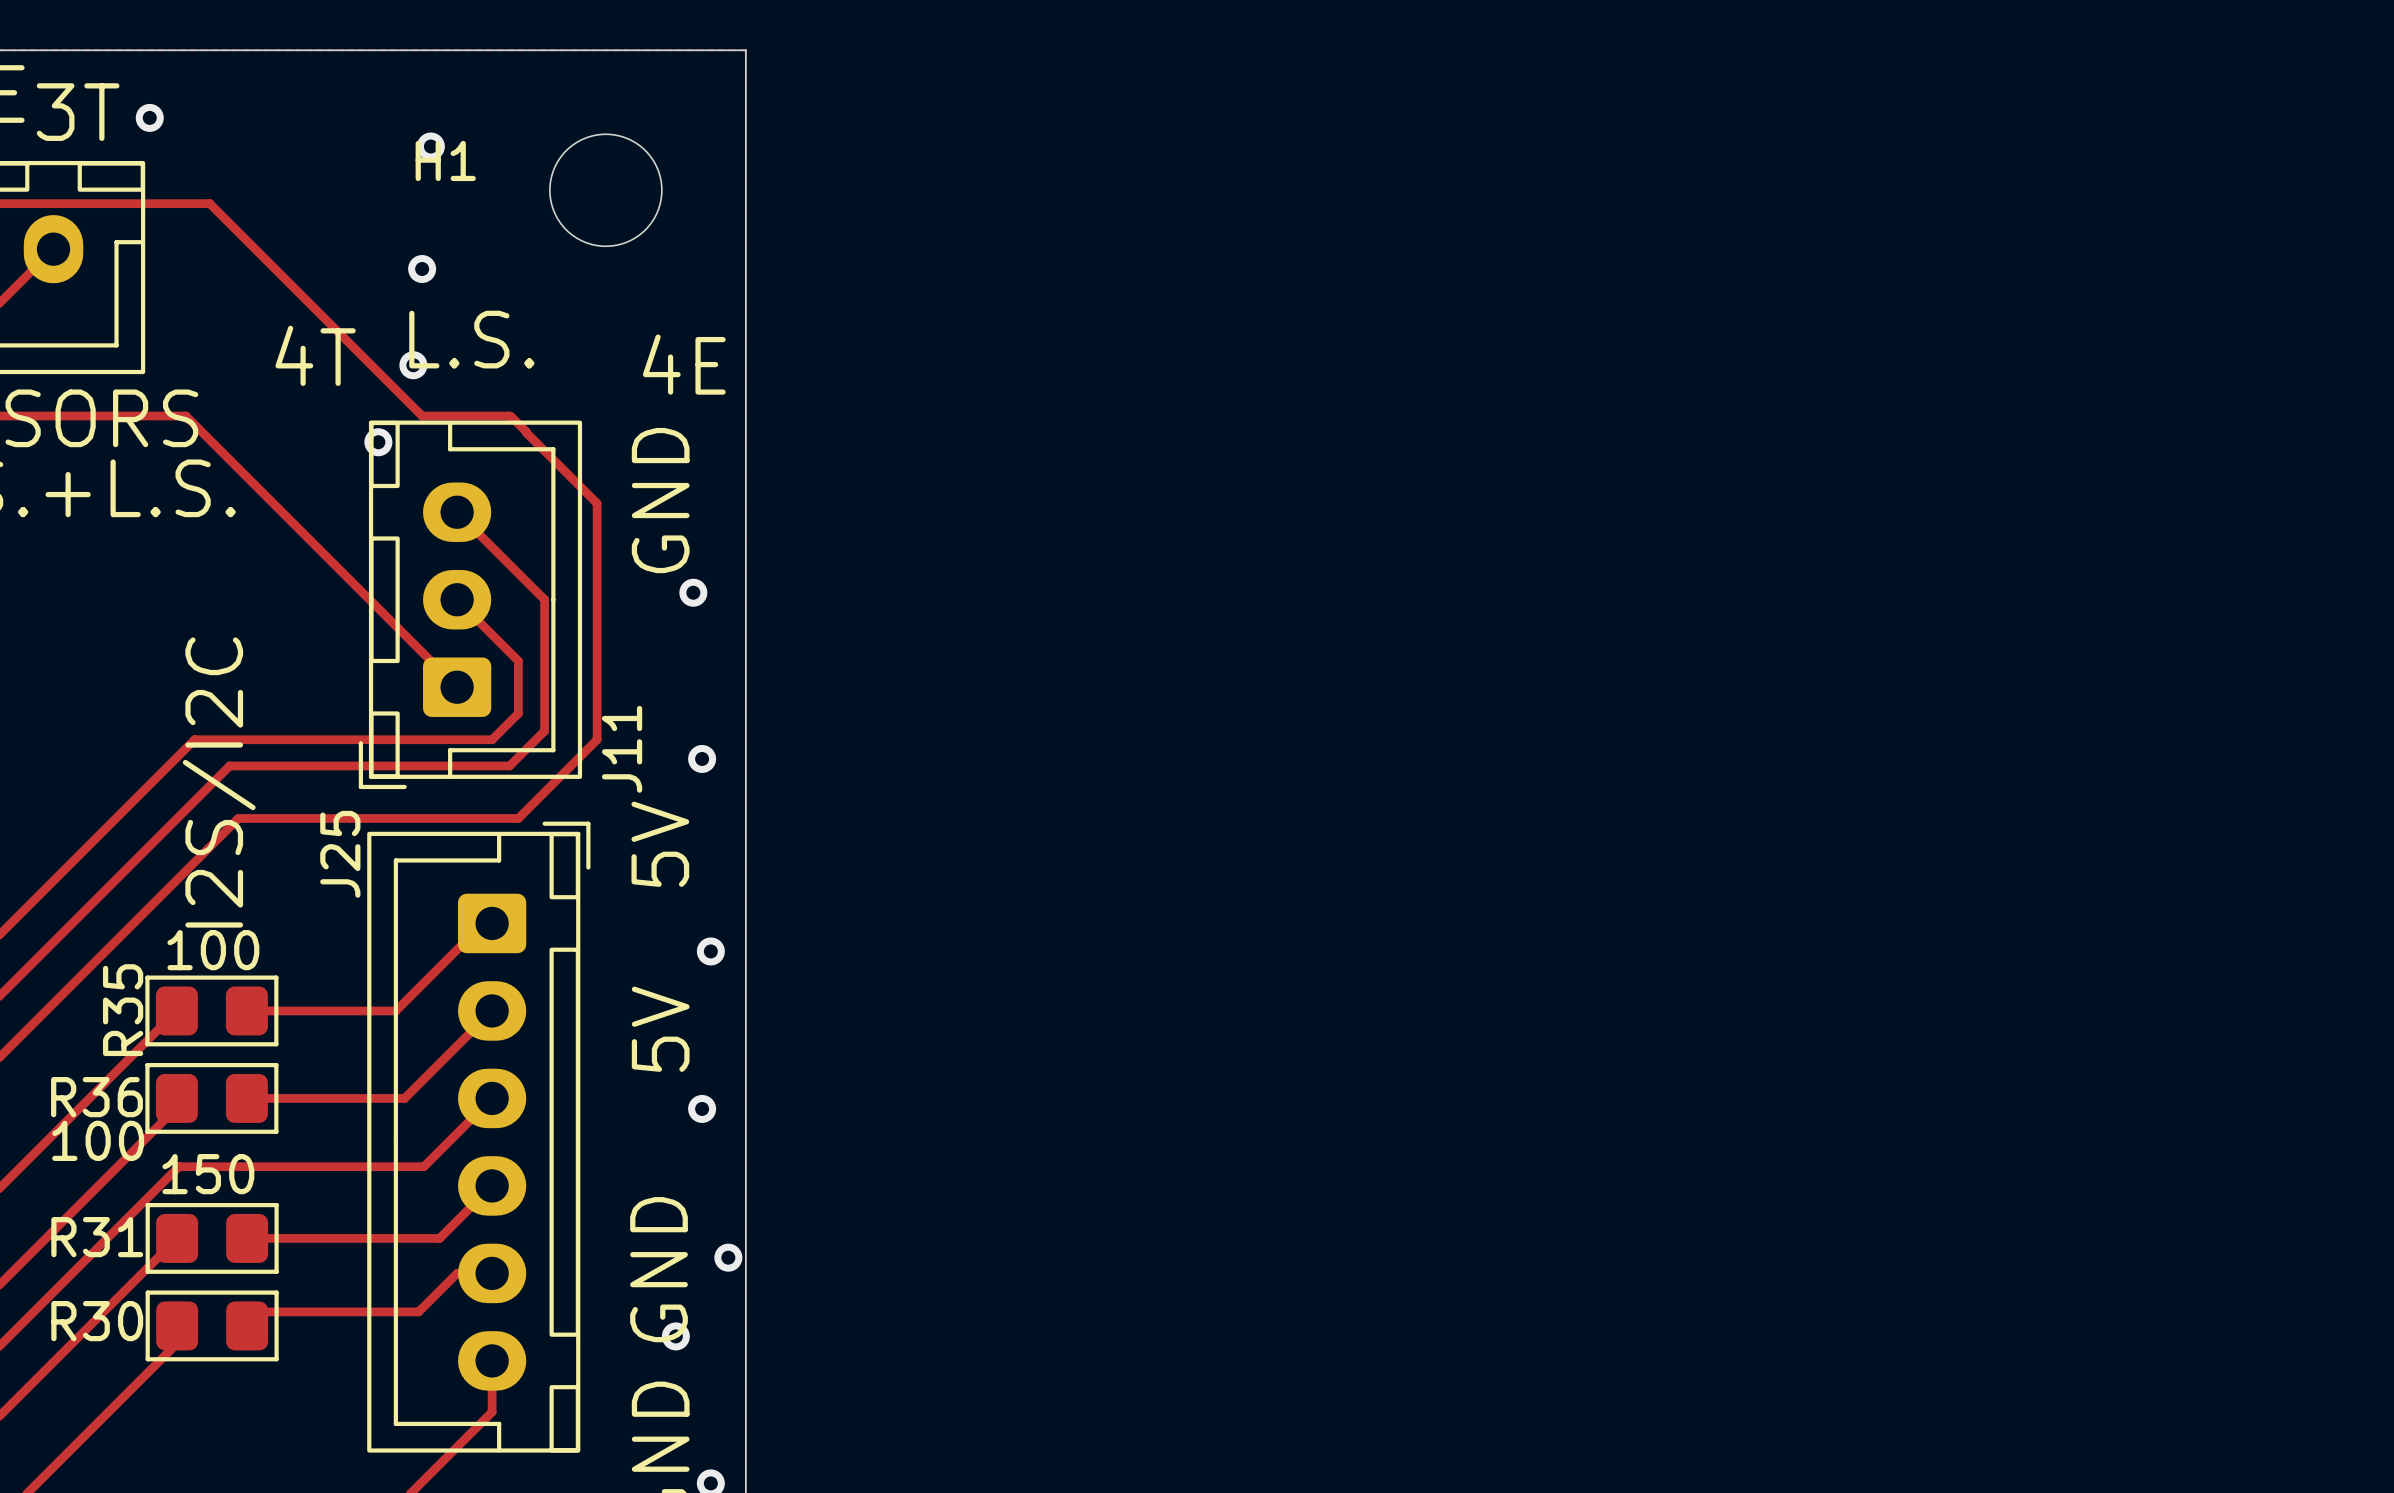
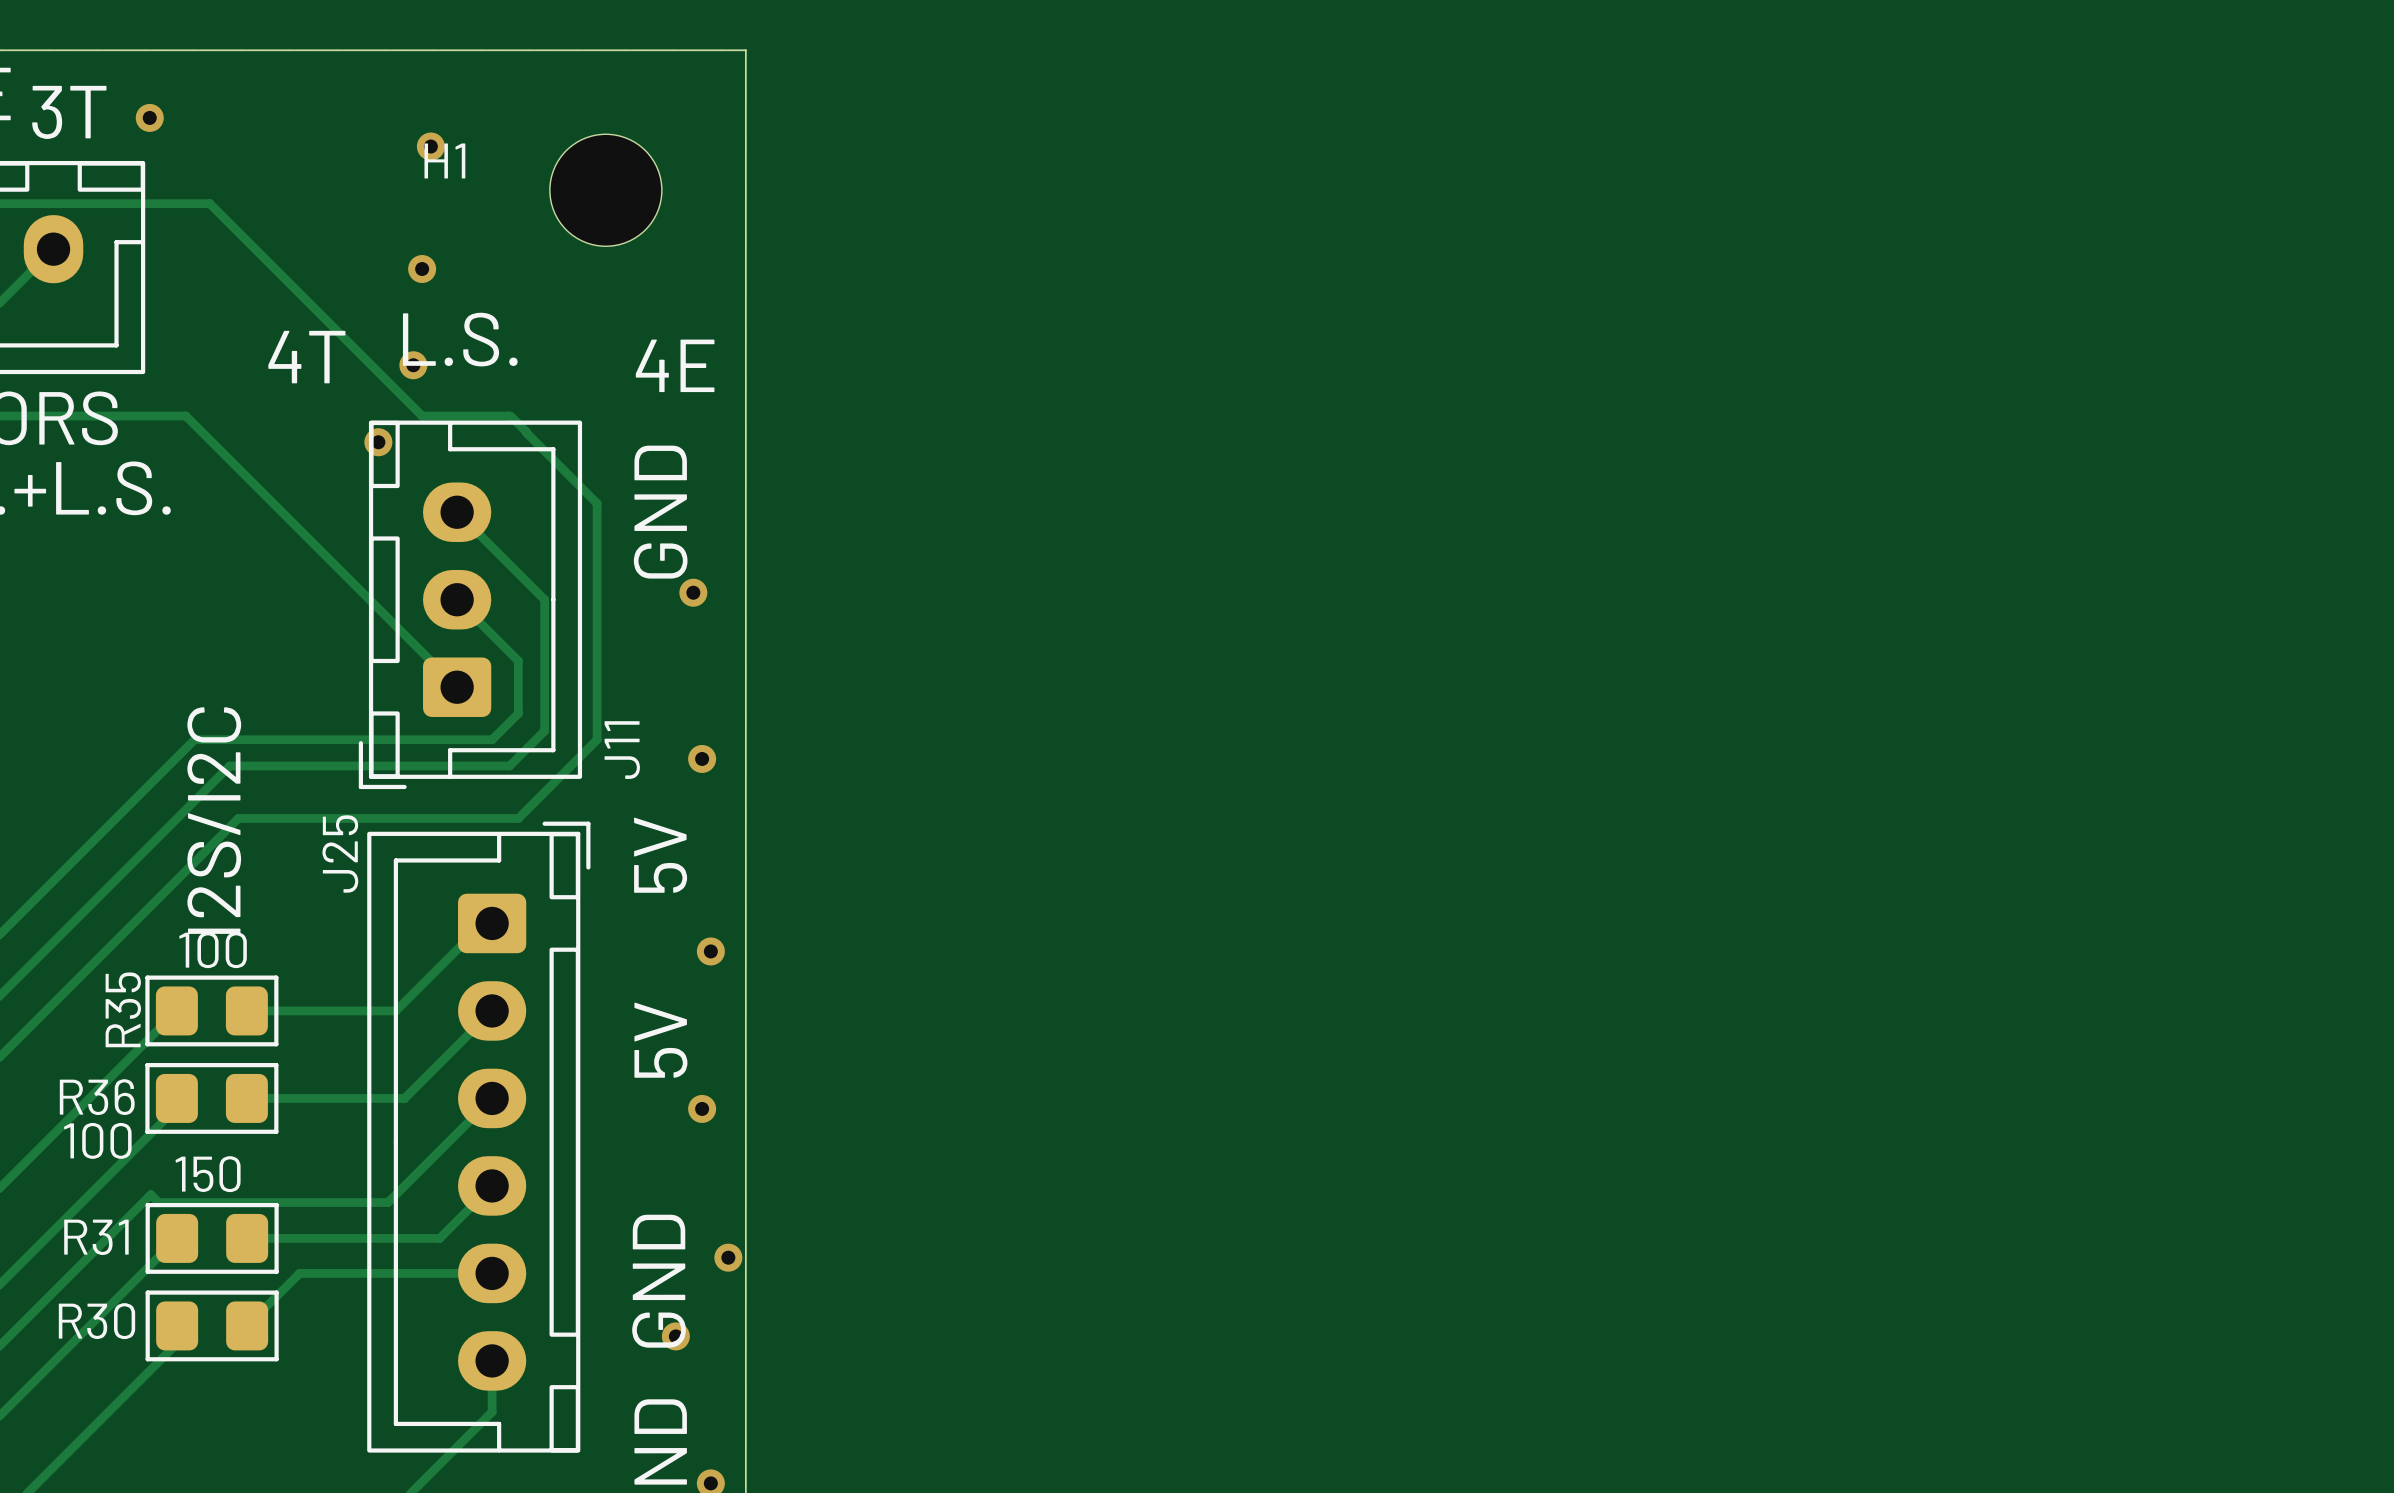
track: (423, 1166) (178, 1166) (150, 1194) -> (423, 1166) (388, 1202) (158, 1202) (150, 1194)
track: (457, 1273) (418, 1311) (261, 1311) -> (457, 1273) (299, 1273) (261, 1311)

